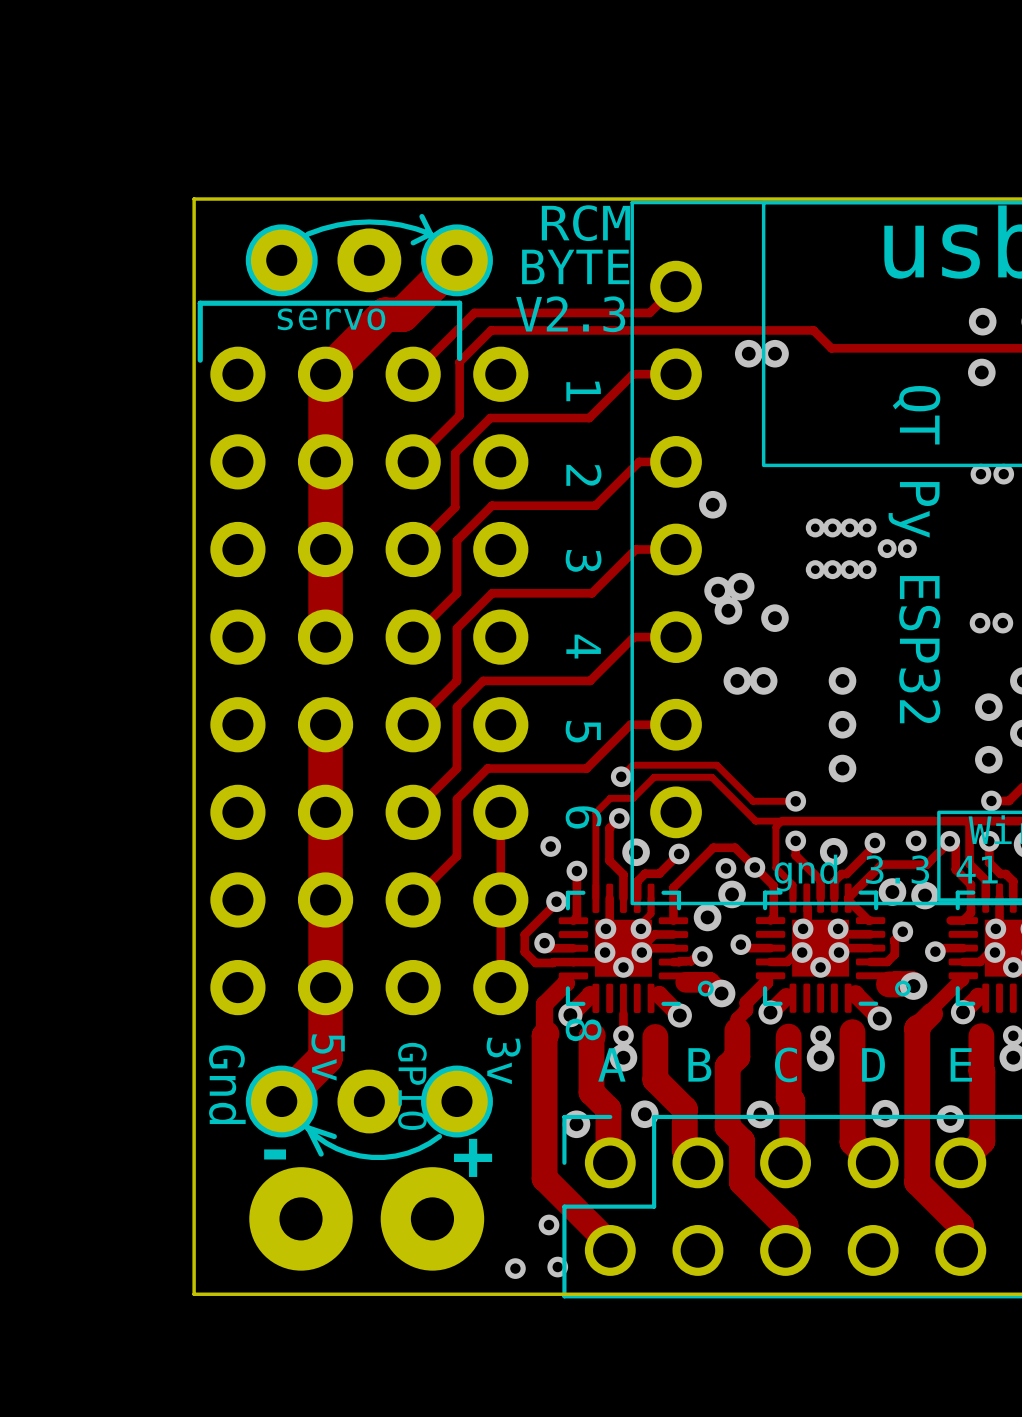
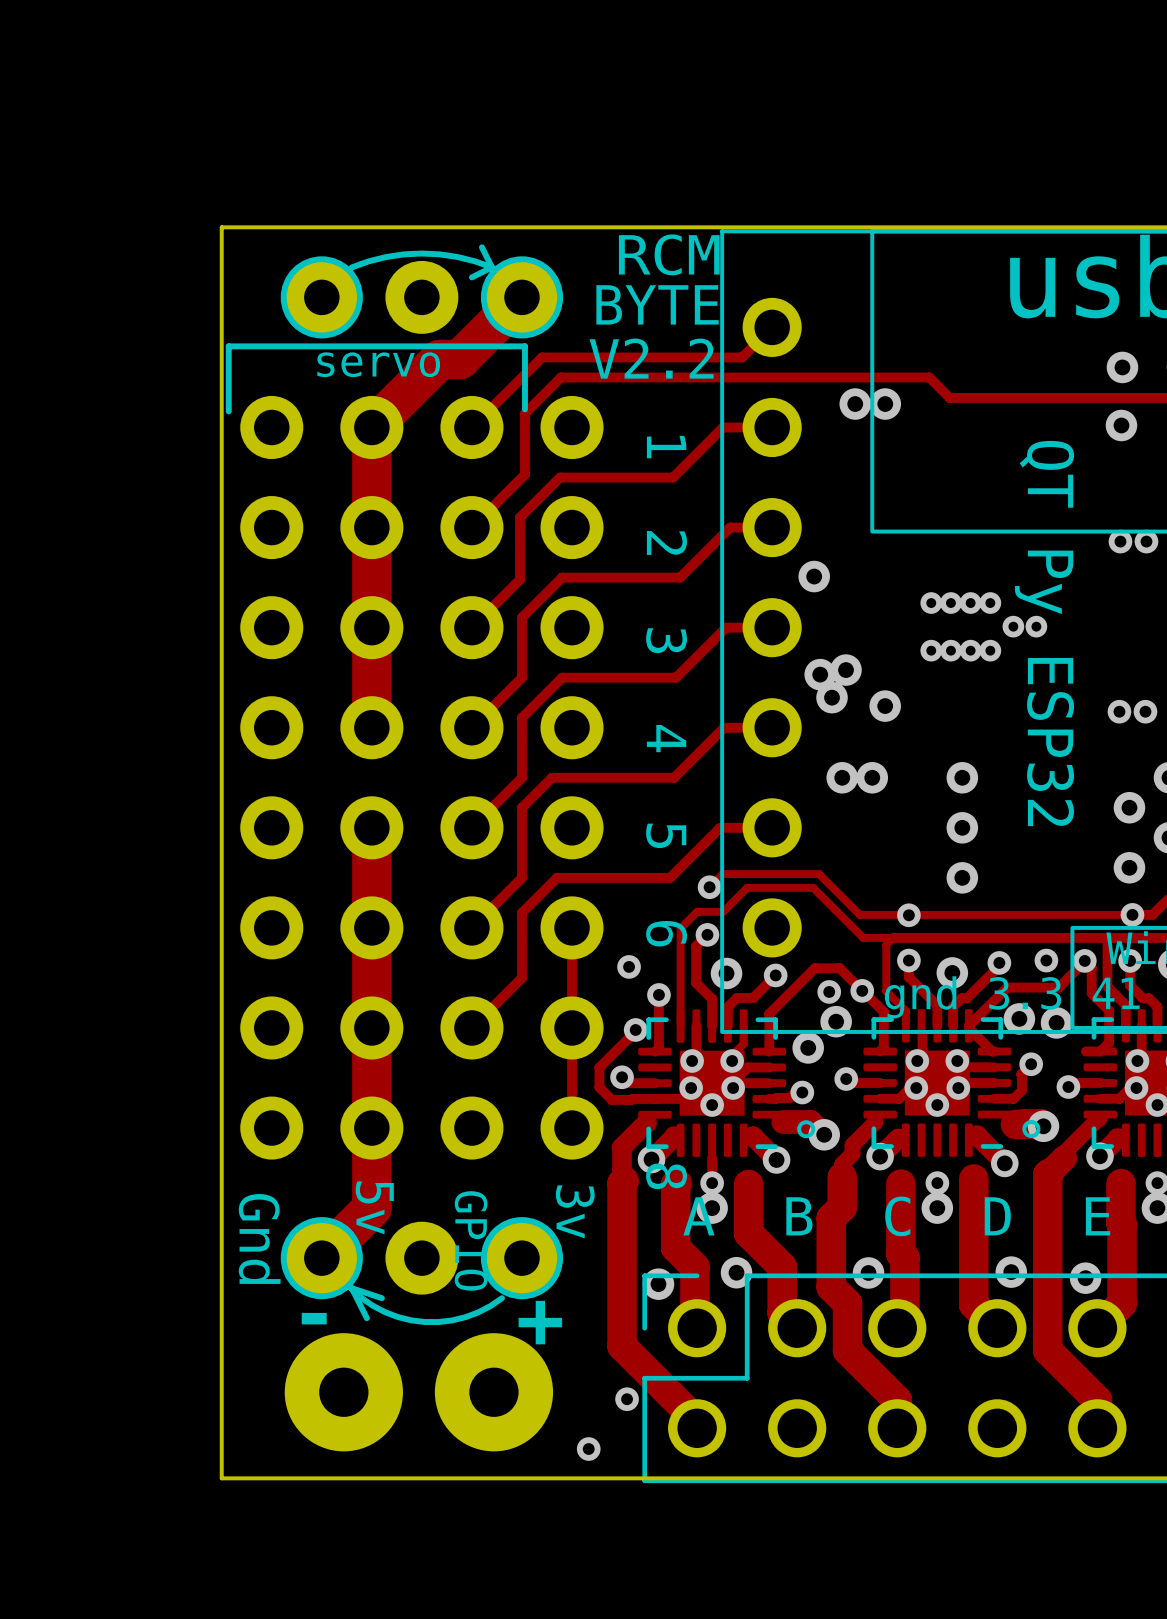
text: V2.3 (570, 314) -> V2.2 (651, 358)
track: (753, 801) (795, 801) -> (859, 914) (1132, 914)
via: (557, 1267) -> none

